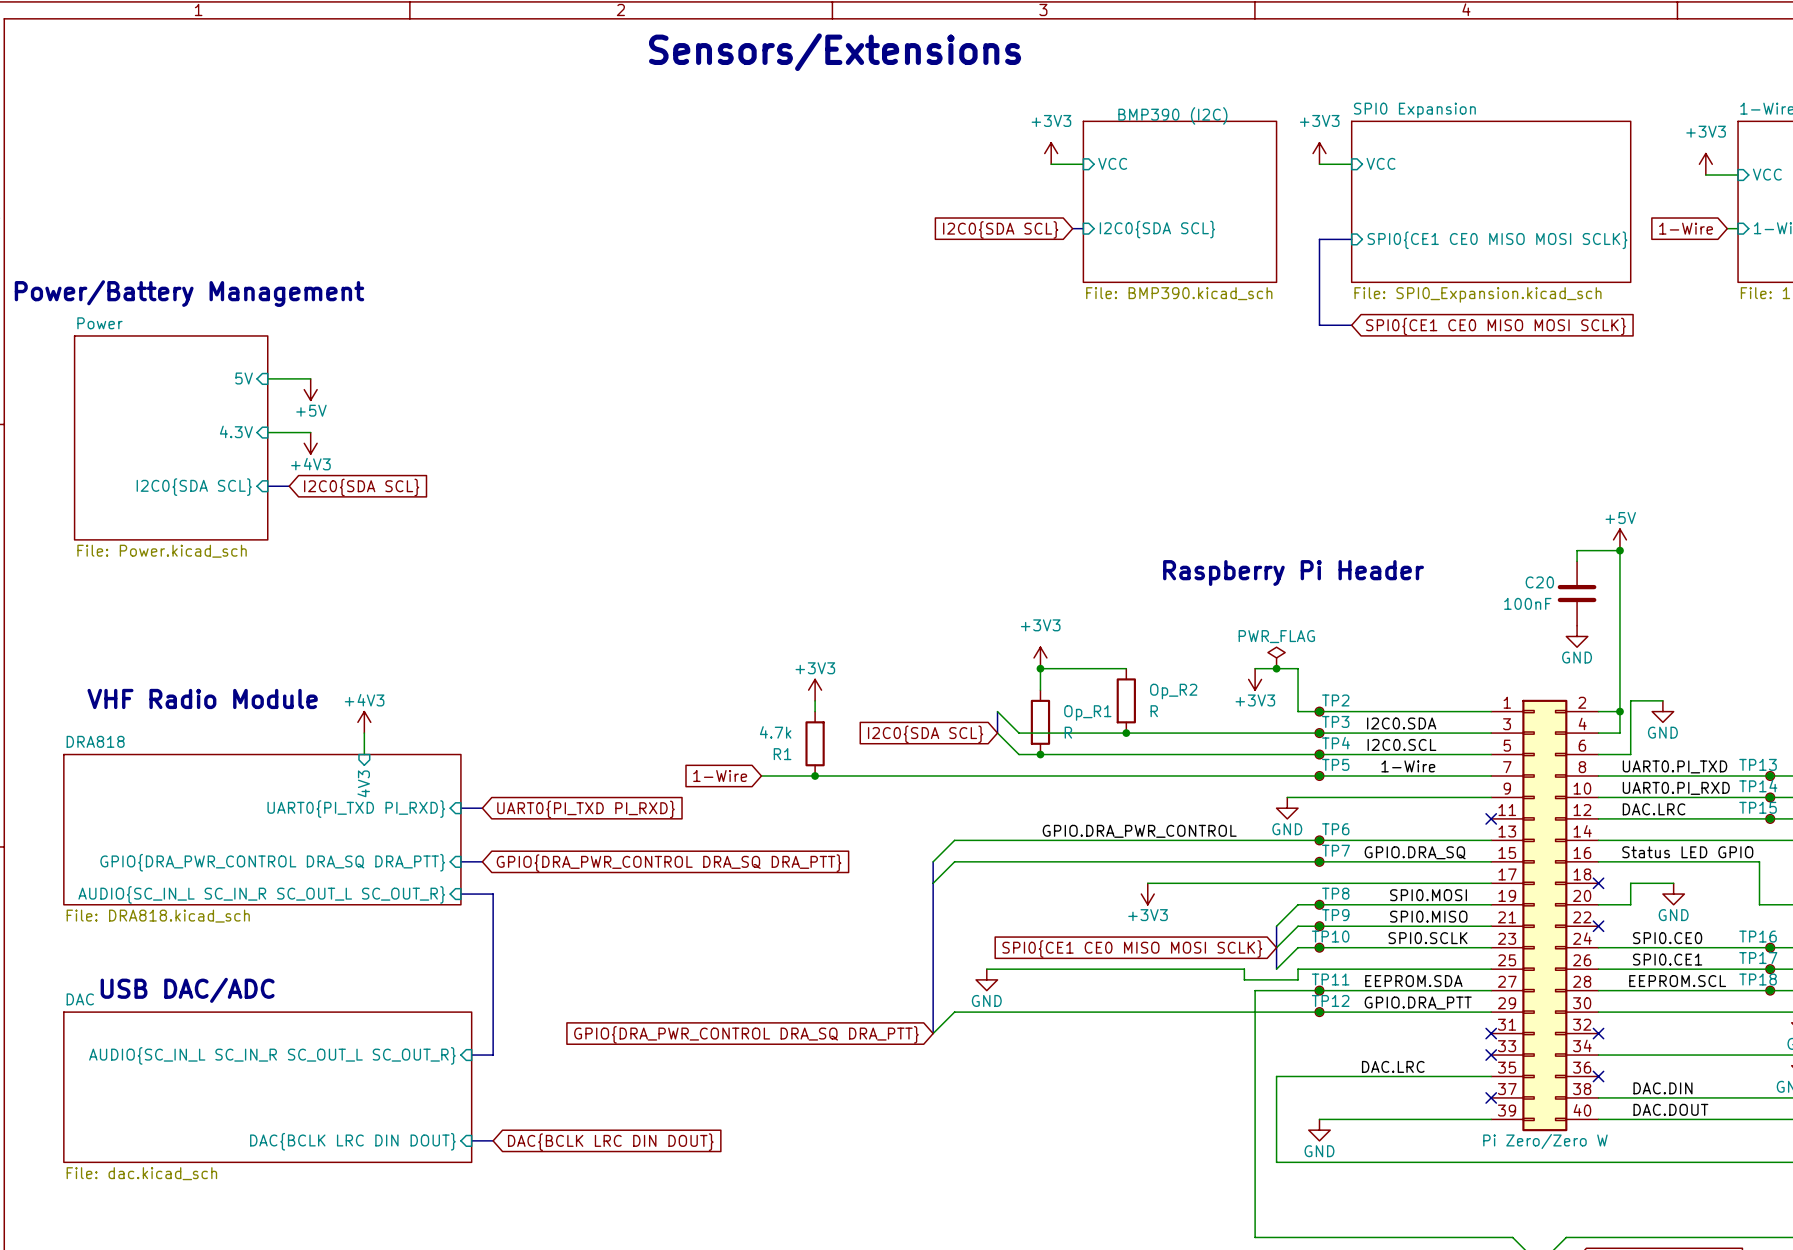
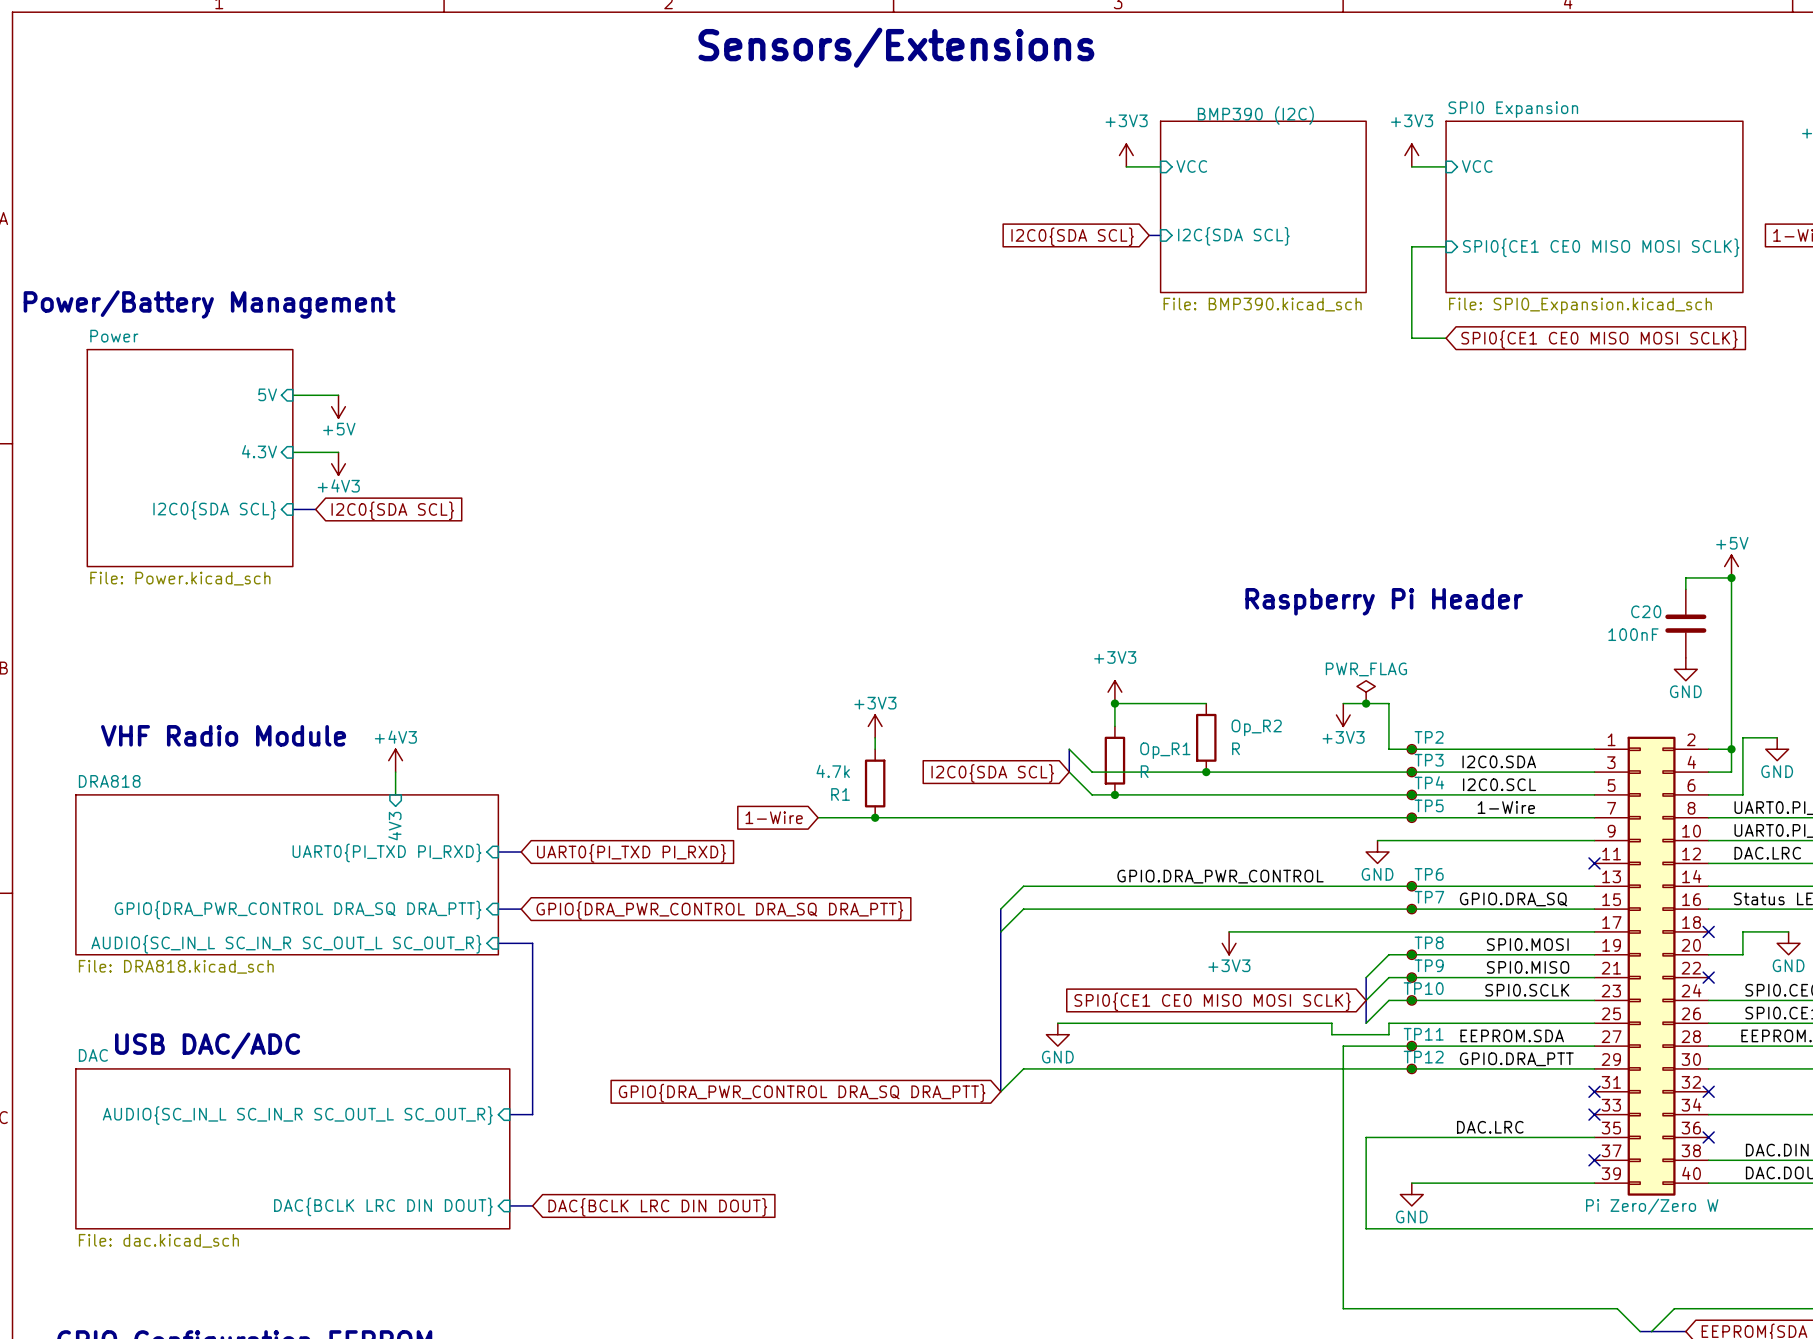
sheet pin: I2C0{SDA SCL} (1157, 229) -> I2C{SDA SCL} (1233, 236)
bus: (1351, 239) (1319, 239) (1319, 325) (1351, 325) -> none

